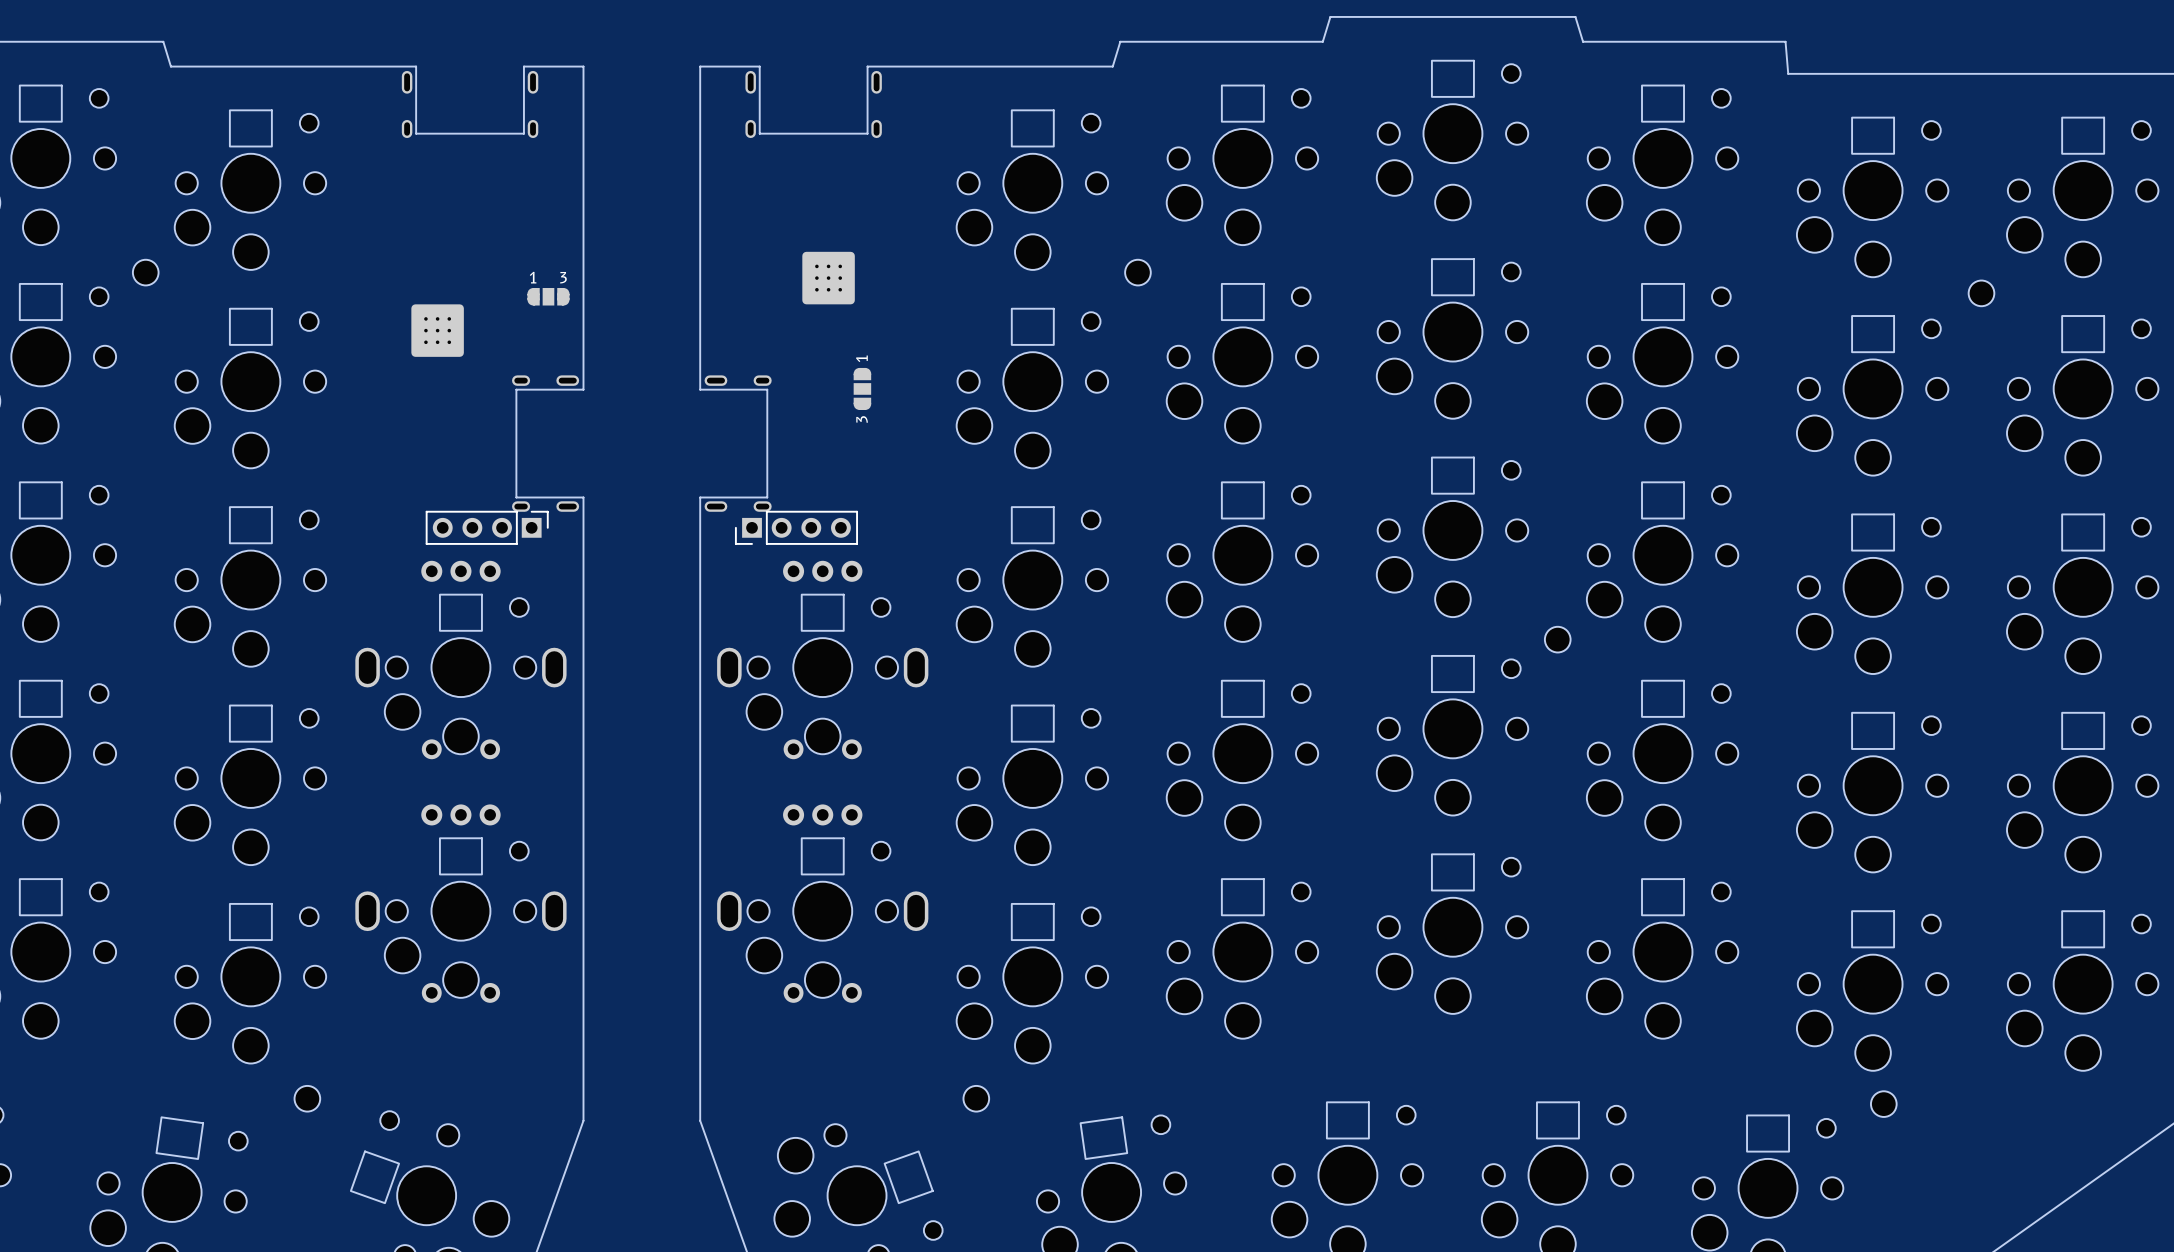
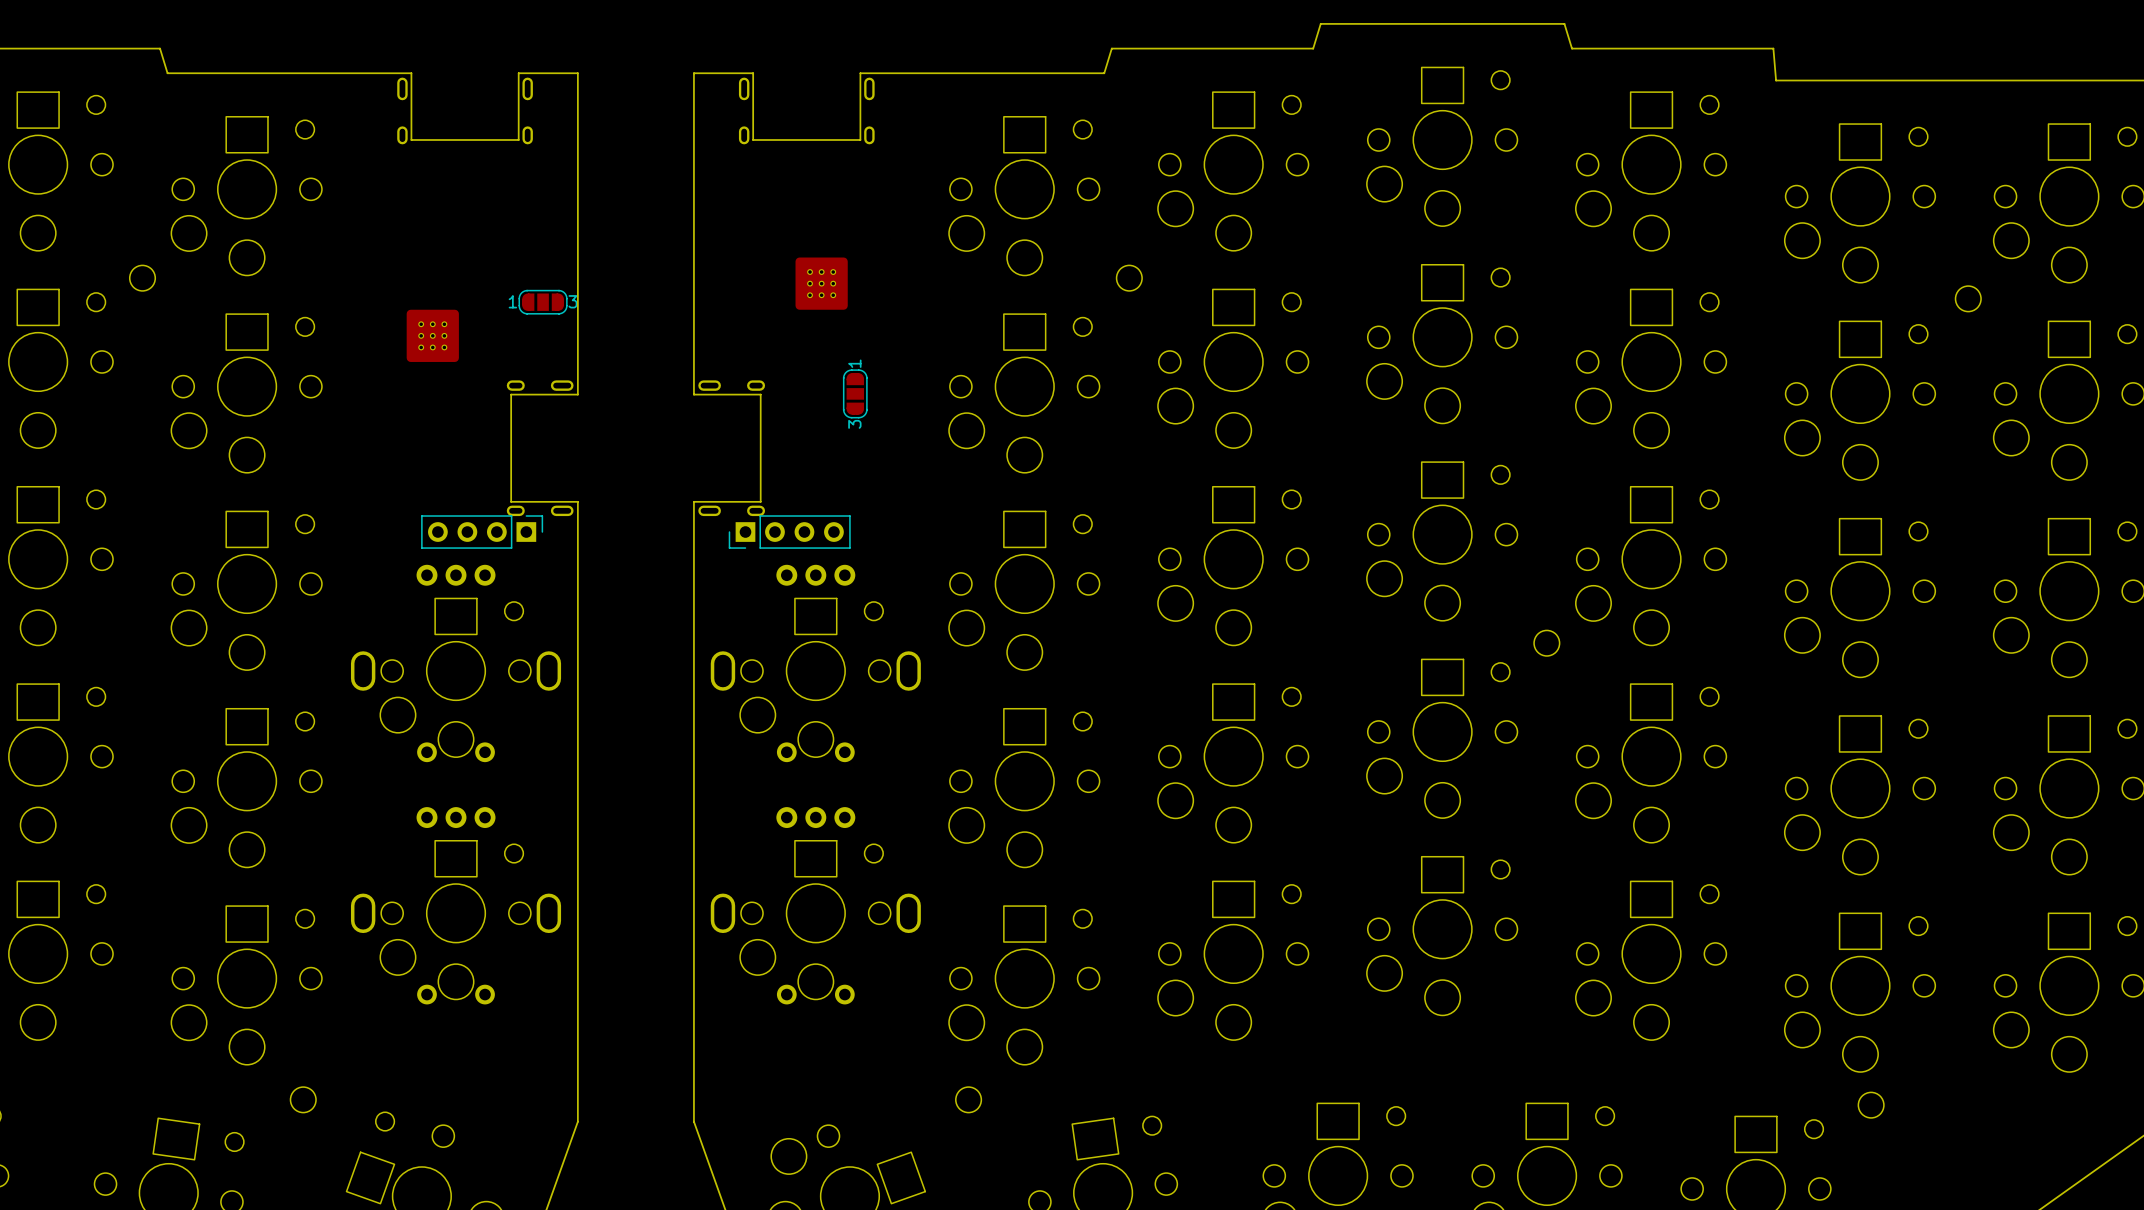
part footprint: [527, 288, 570, 306] -> [518, 289, 568, 315]
part footprint: [853, 367, 872, 410] -> [842, 369, 868, 419]

